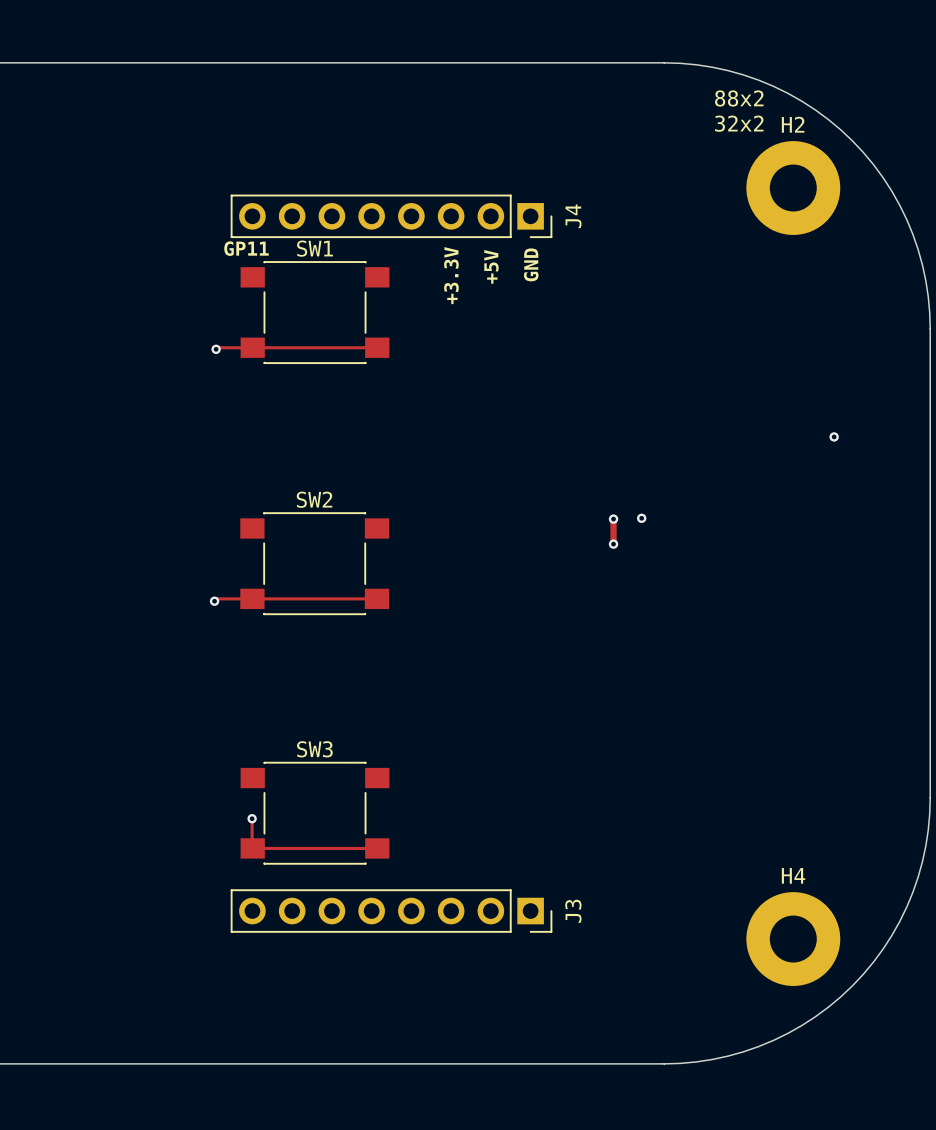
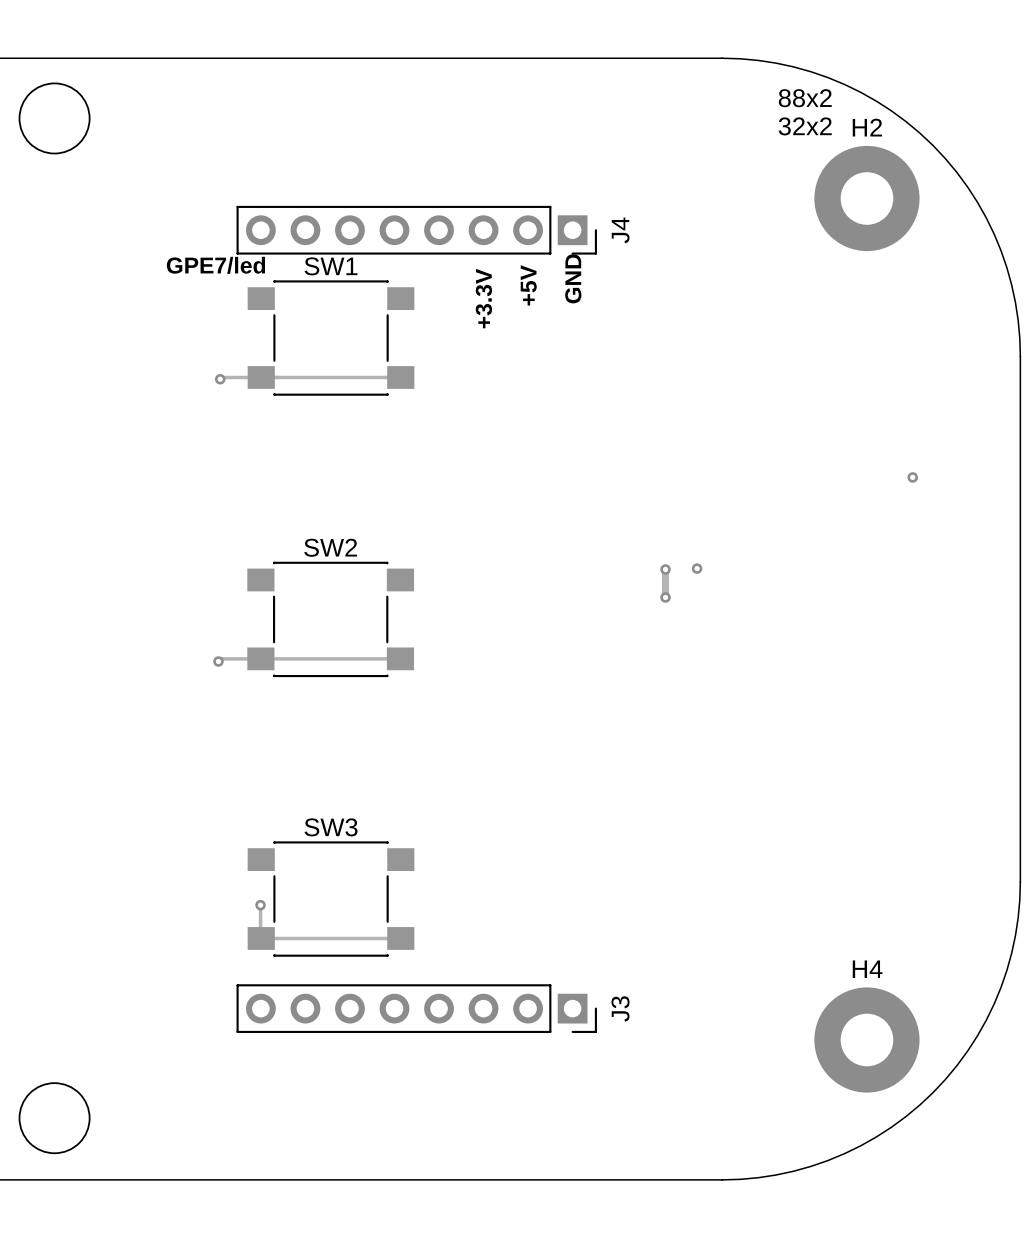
round board edge: none -> [18, 82, 91, 155]
text: none -> GPE7/led (215, 265)
text: GP11 (246, 248) -> none
round board edge: none -> [18, 1082, 91, 1155]

